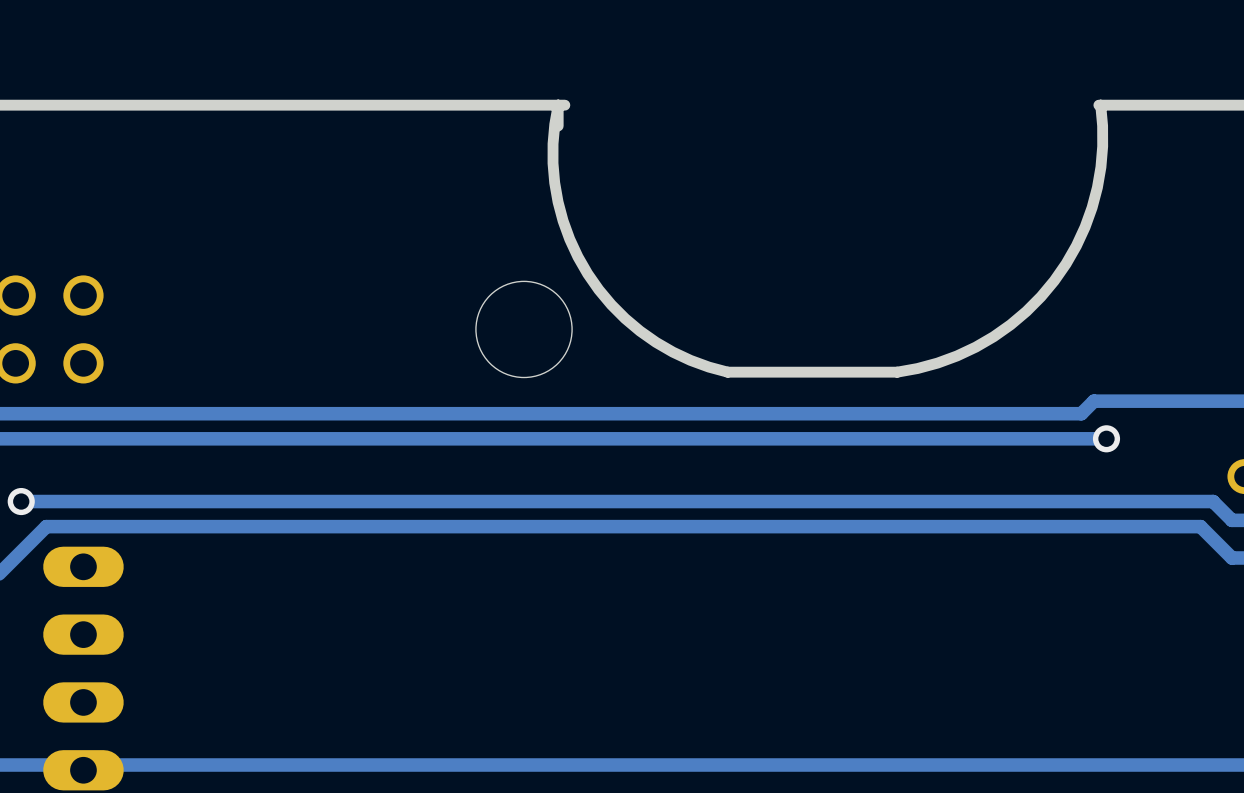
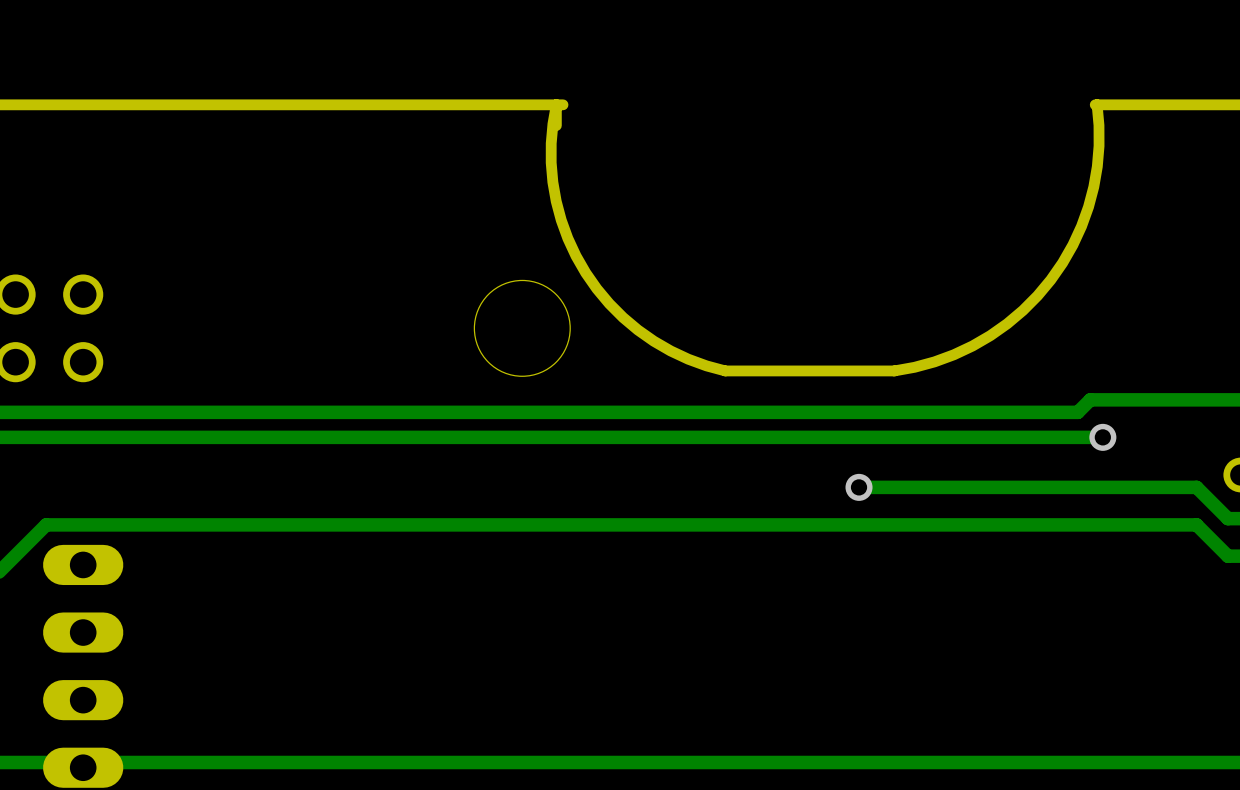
via: none -> (859, 487)
via: (21, 501) -> none
track: (1213, 501) (21, 501) -> (1209, 499) (1196, 487) (859, 487)

